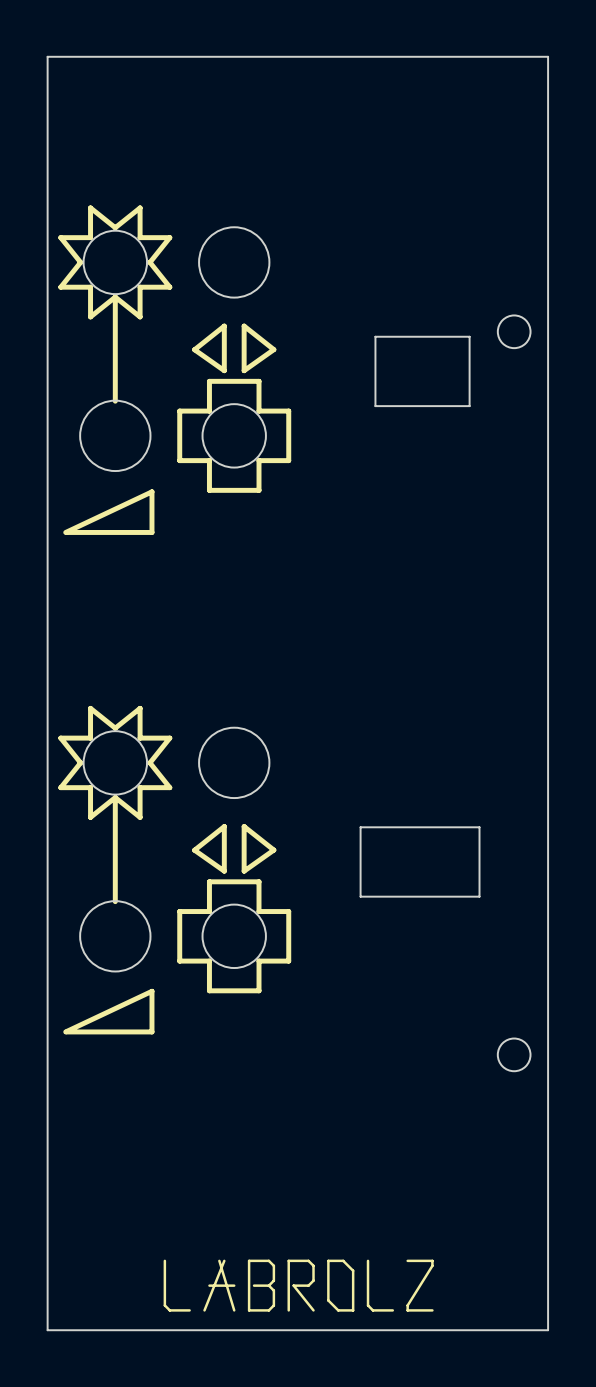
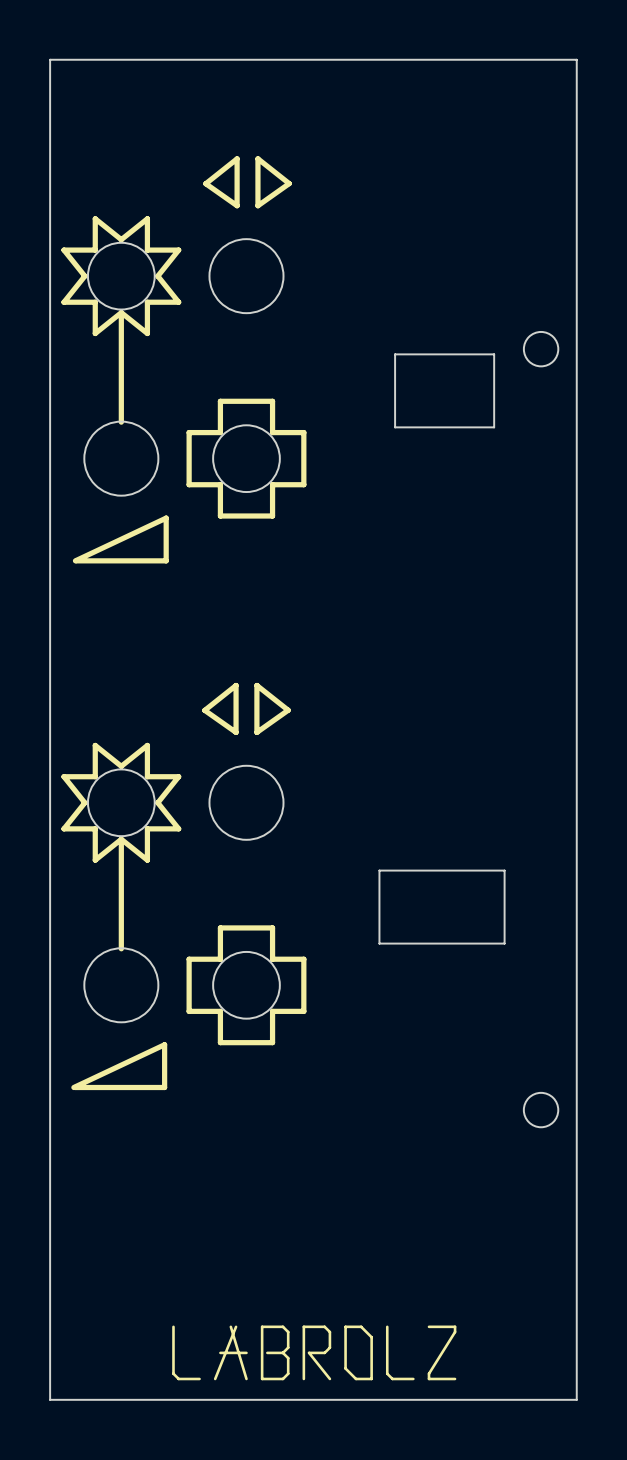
line: none -> (237, 158) (237, 205) (205, 183) (237, 158)
line: none -> (257, 158) (257, 205) (289, 183) (257, 158)
drawing: [177, 323, 292, 493] -> none
drawing: [63, 489, 155, 535] -> none
line: none -> (75, 560) (166, 518) (166, 560) (76, 560)
line: none -> (236, 685) (236, 732) (204, 710) (236, 685)
line: none -> (256, 685) (256, 732) (288, 710) (256, 685)
drawing: [177, 824, 292, 994] -> none
drawing: [63, 988, 155, 1035] -> none
line: none -> (73, 1087) (164, 1044) (164, 1087) (74, 1087)

